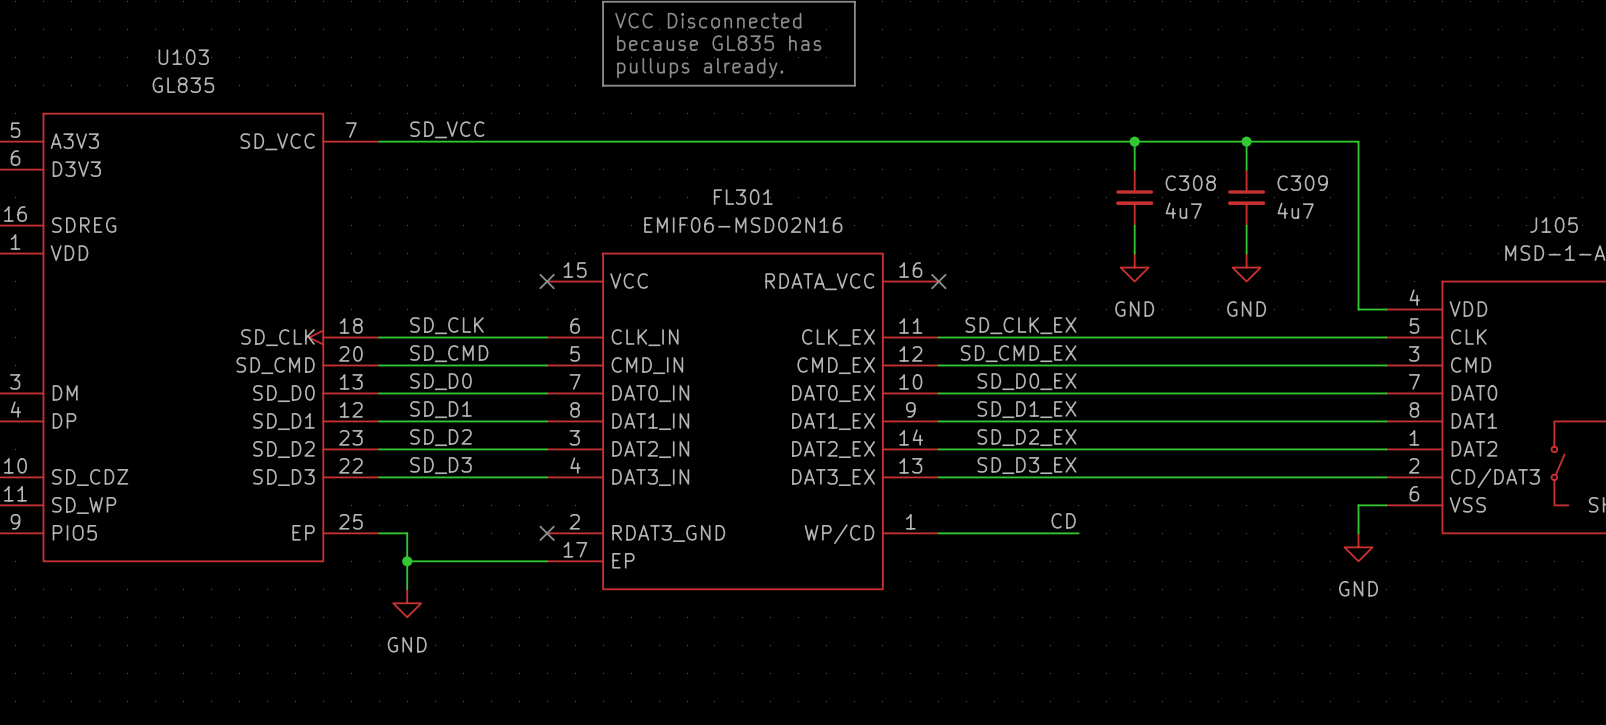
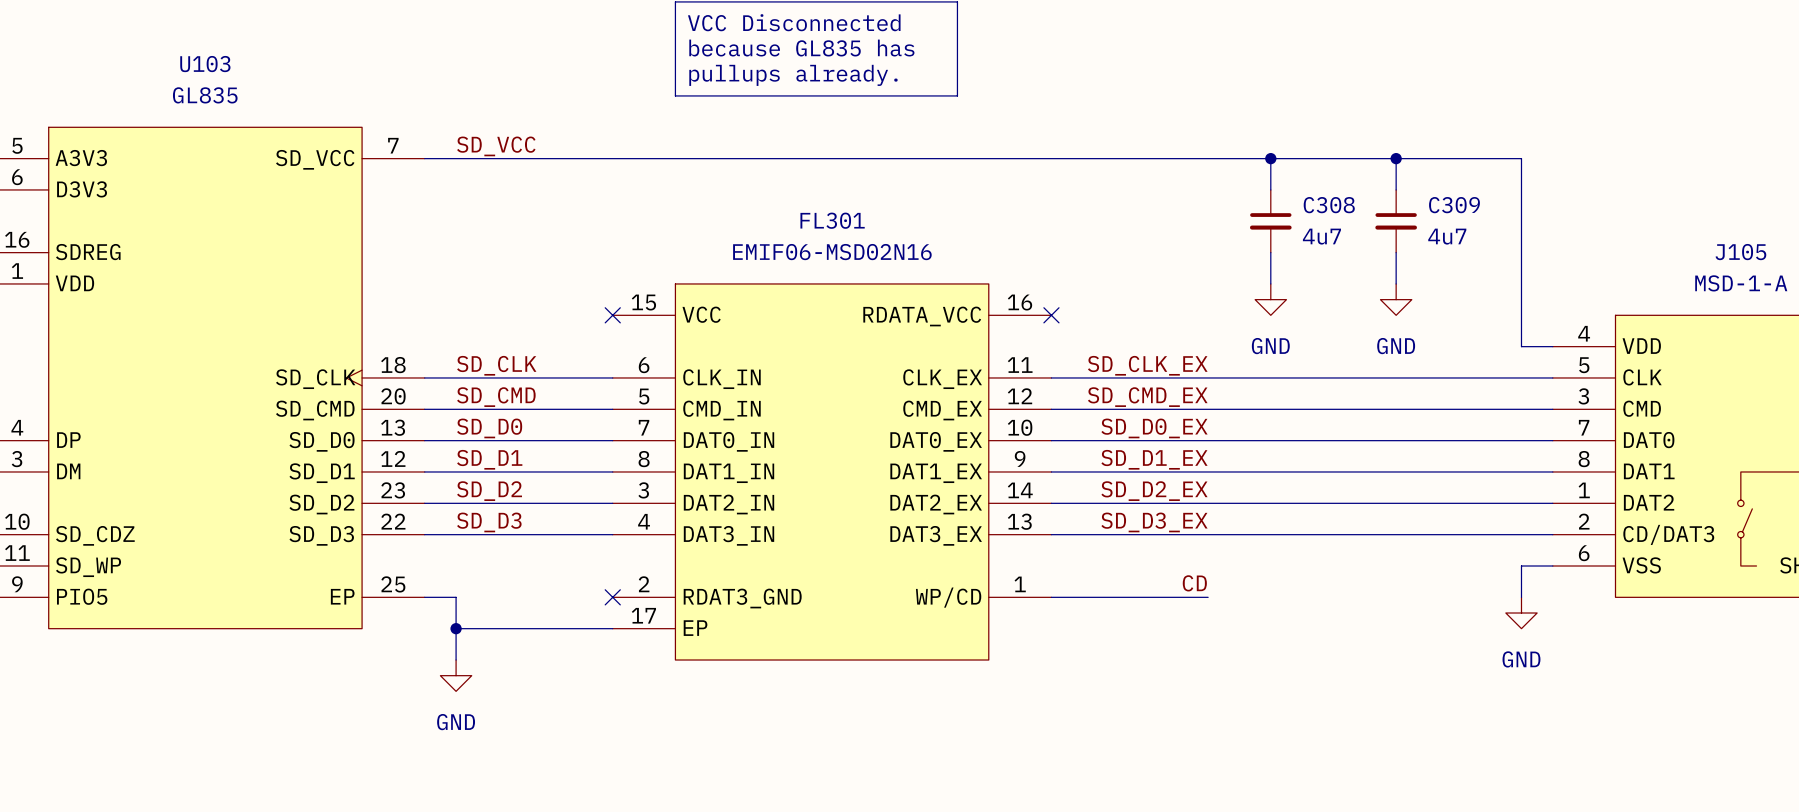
U103 pin number: 3 (15, 381) -> 4 (17, 427)
U103 pin name: DM (65, 392) -> DP (68, 440)
U103 pin number: 4 (15, 409) -> 3 (16, 459)
U103 pin name: DP (64, 420) -> DM (68, 471)

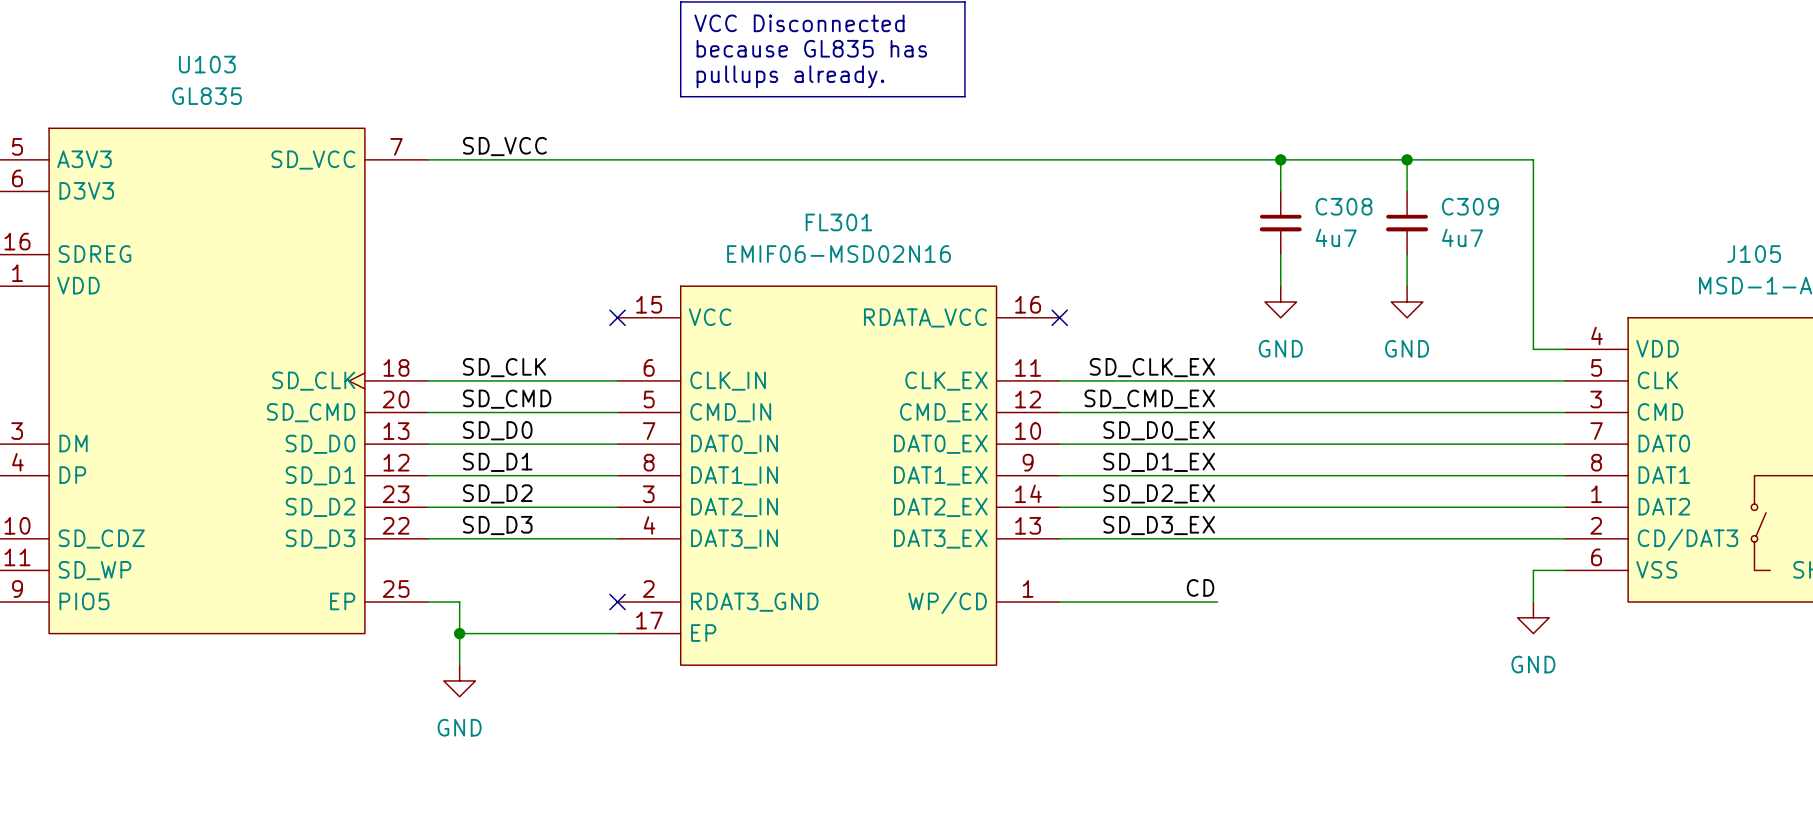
U103 pin number: 4 (17, 427) -> 3 (17, 431)
U103 pin name: DP (68, 440) -> DM (73, 443)
U103 pin number: 3 (16, 459) -> 4 (17, 462)
U103 pin name: DM (68, 471) -> DP (72, 475)

